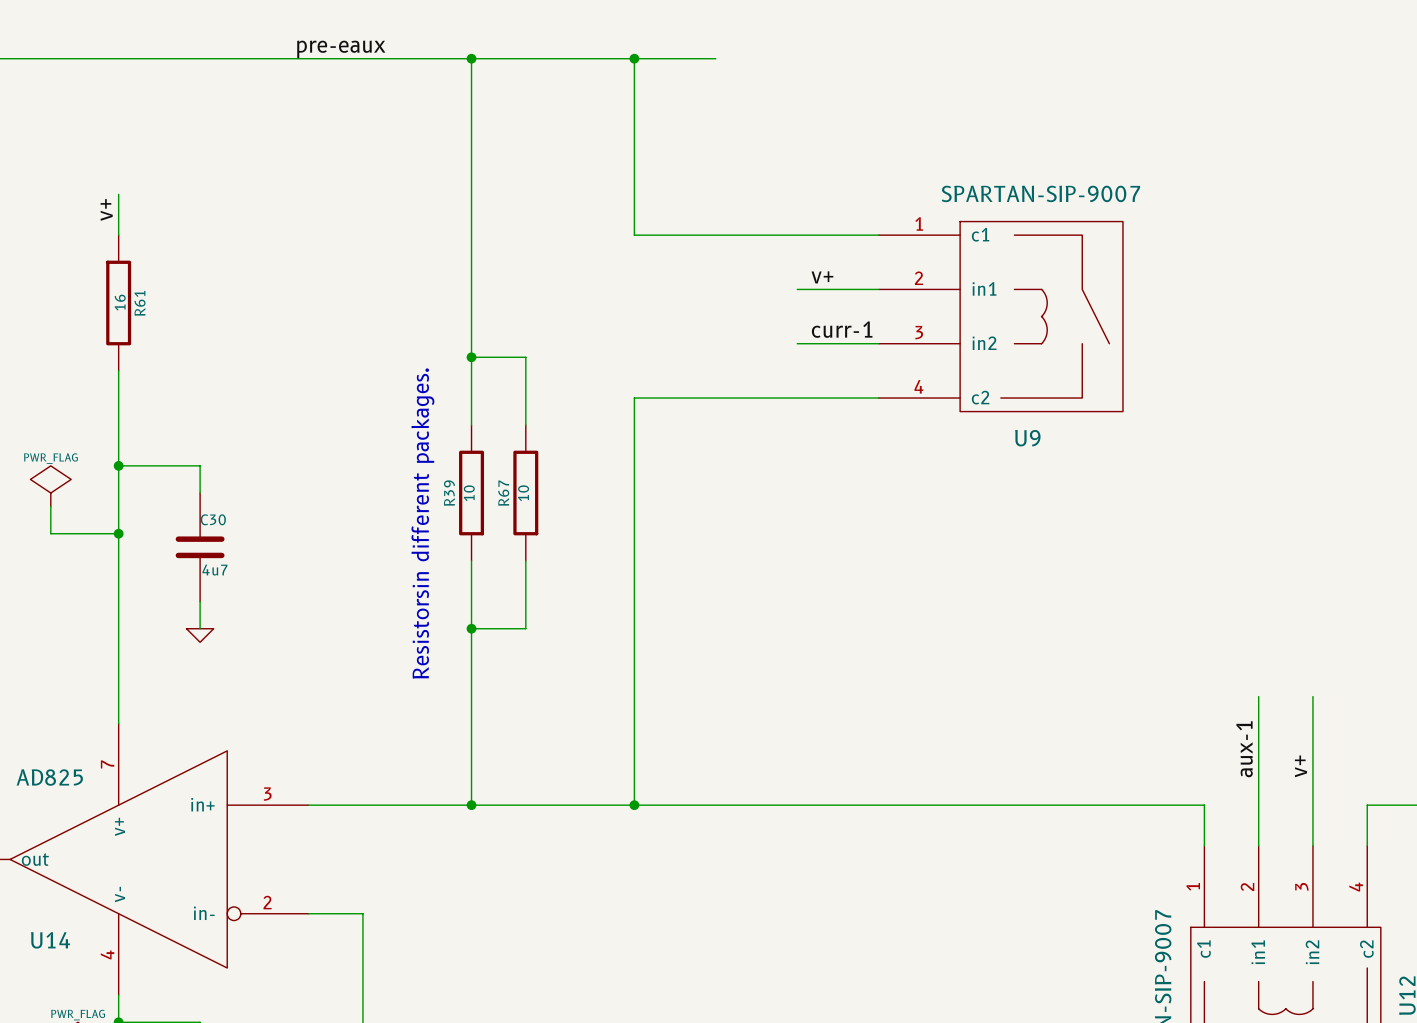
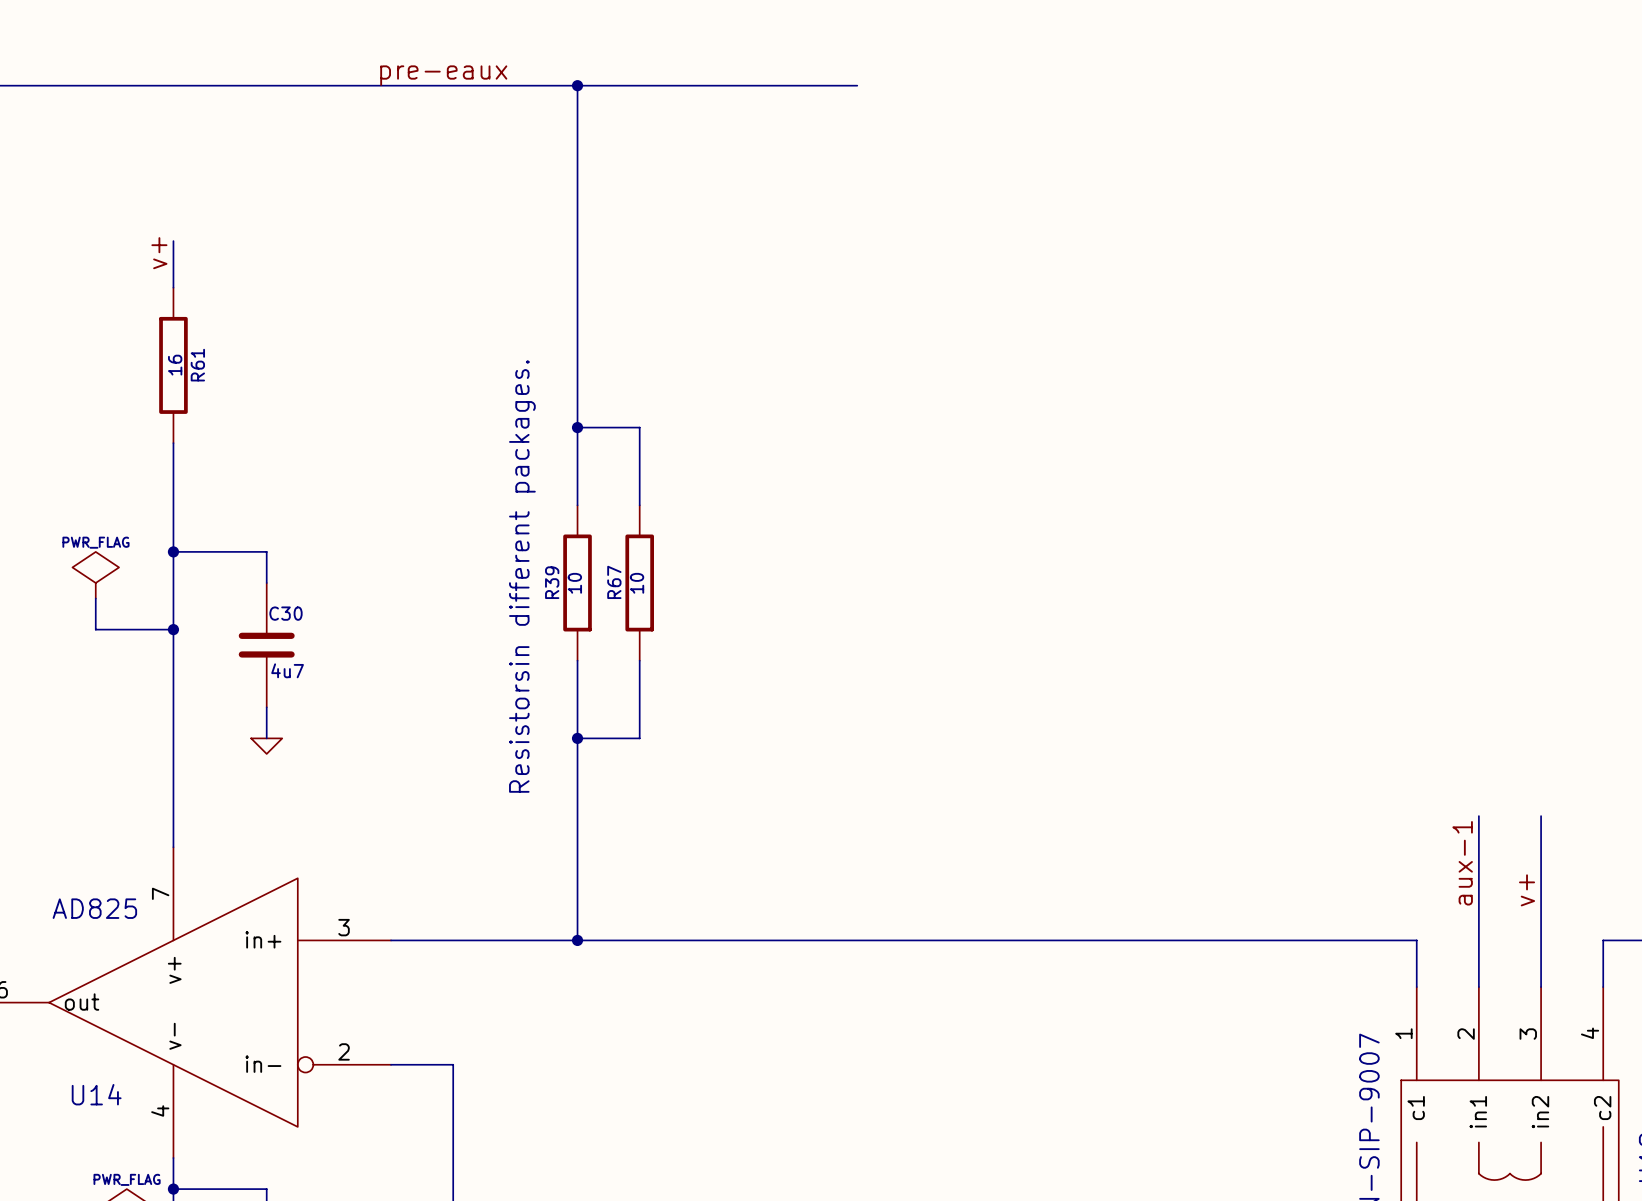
wire: (634, 58) (634, 235) (878, 235) -> none
junction: (634, 58) -> none
label: v+ (822, 277) -> none
wire: (797, 289) (878, 289) -> none
U9: SPARTAN-SIP-9007 (1000, 316) -> none
label: curr-1 (842, 329) -> none
wire: (797, 343) (878, 343) -> none
wire: (878, 398) (634, 398) (634, 805) -> none
junction: (634, 805) -> none

